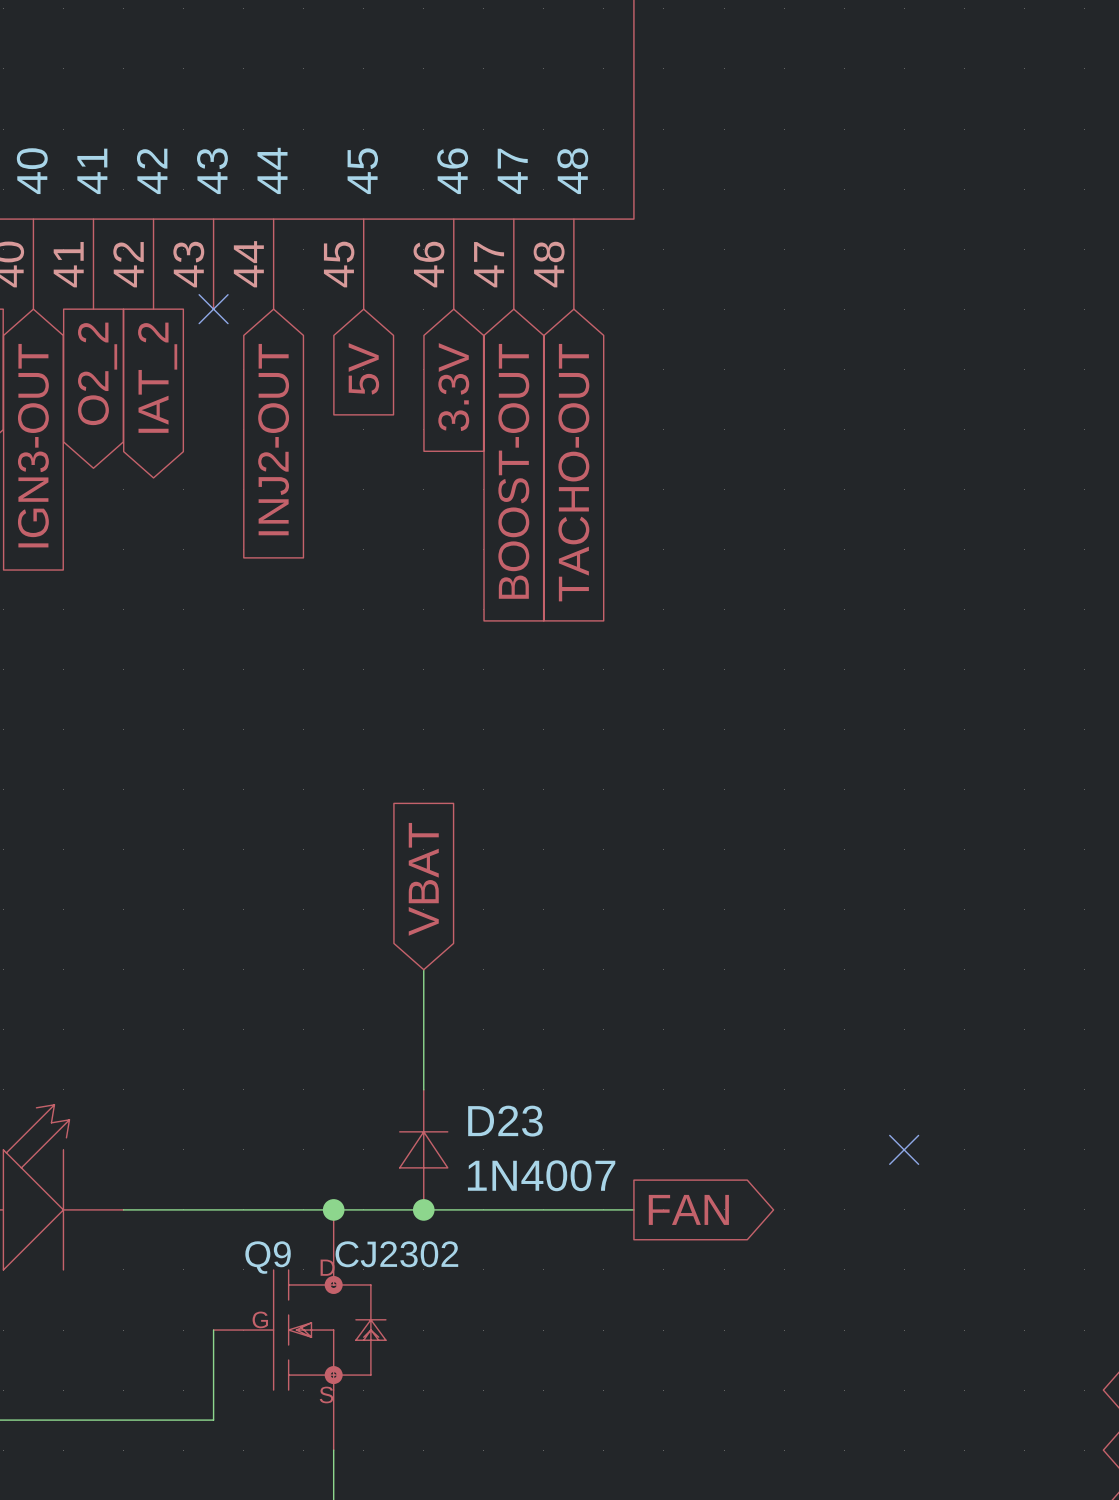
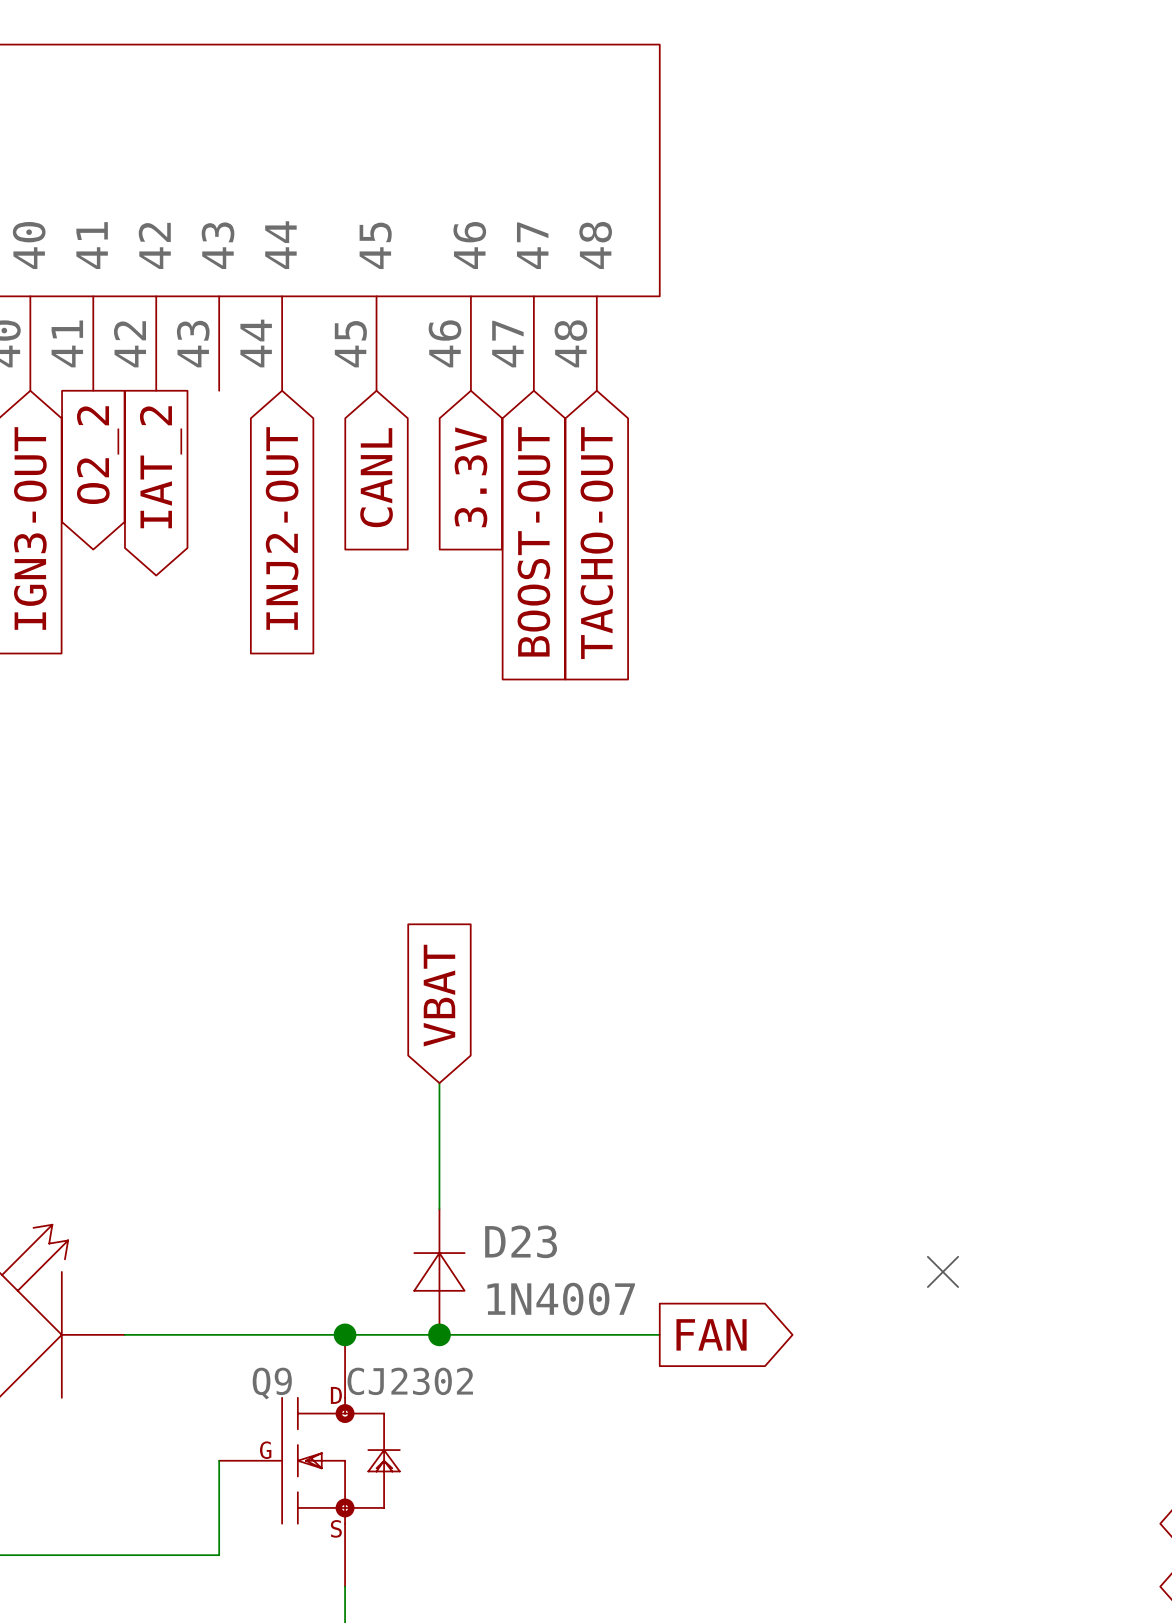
no-connect mark: (213, 309) -> none
global label: 5V (363, 368) -> CANL (376, 477)

